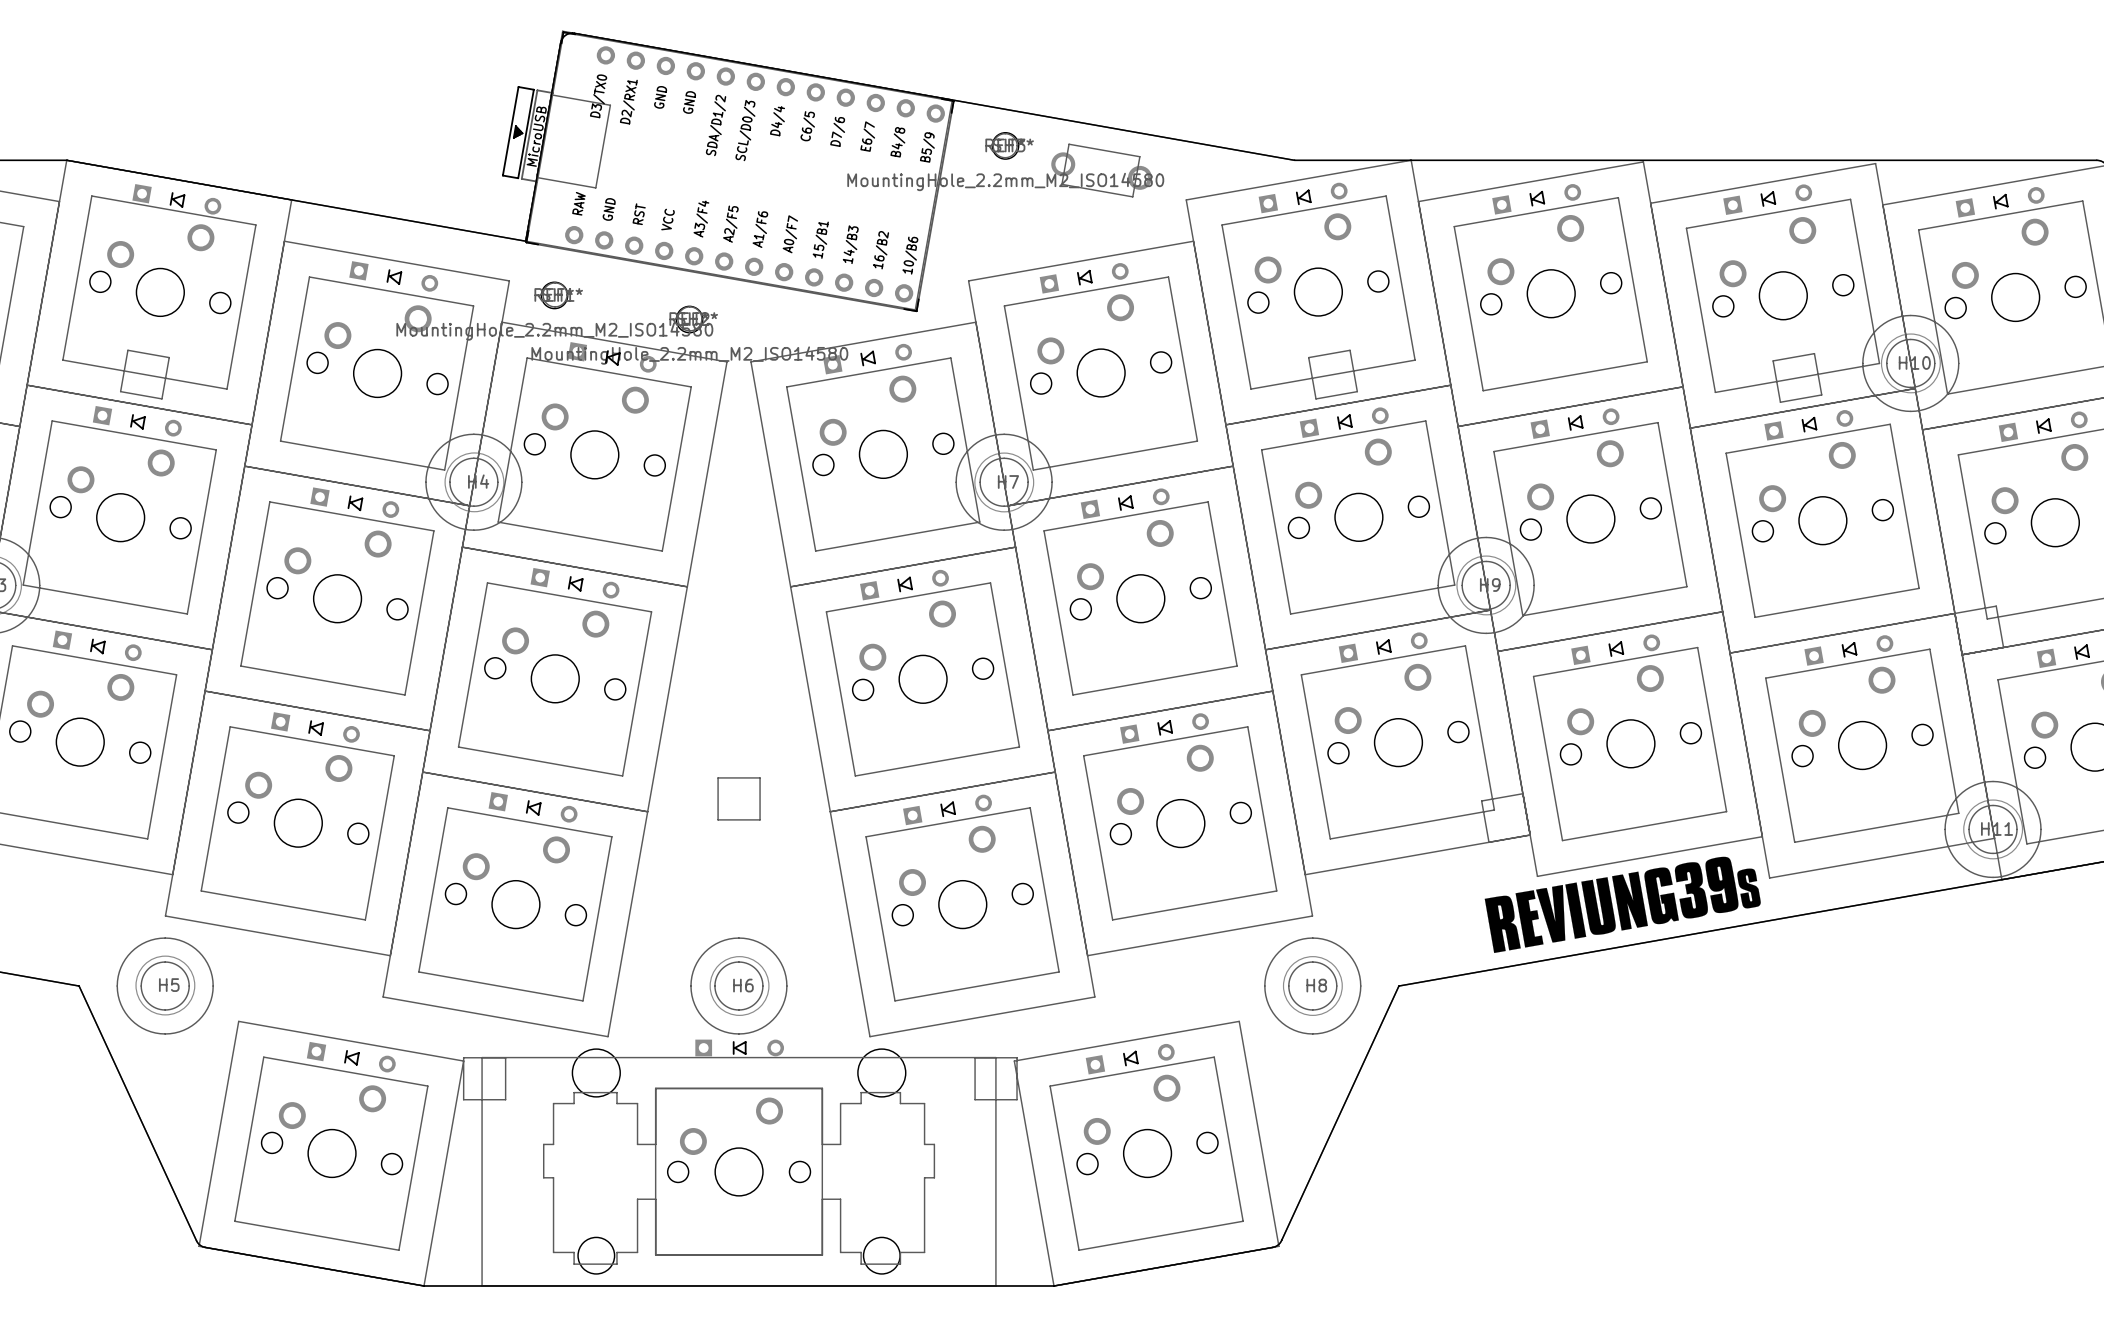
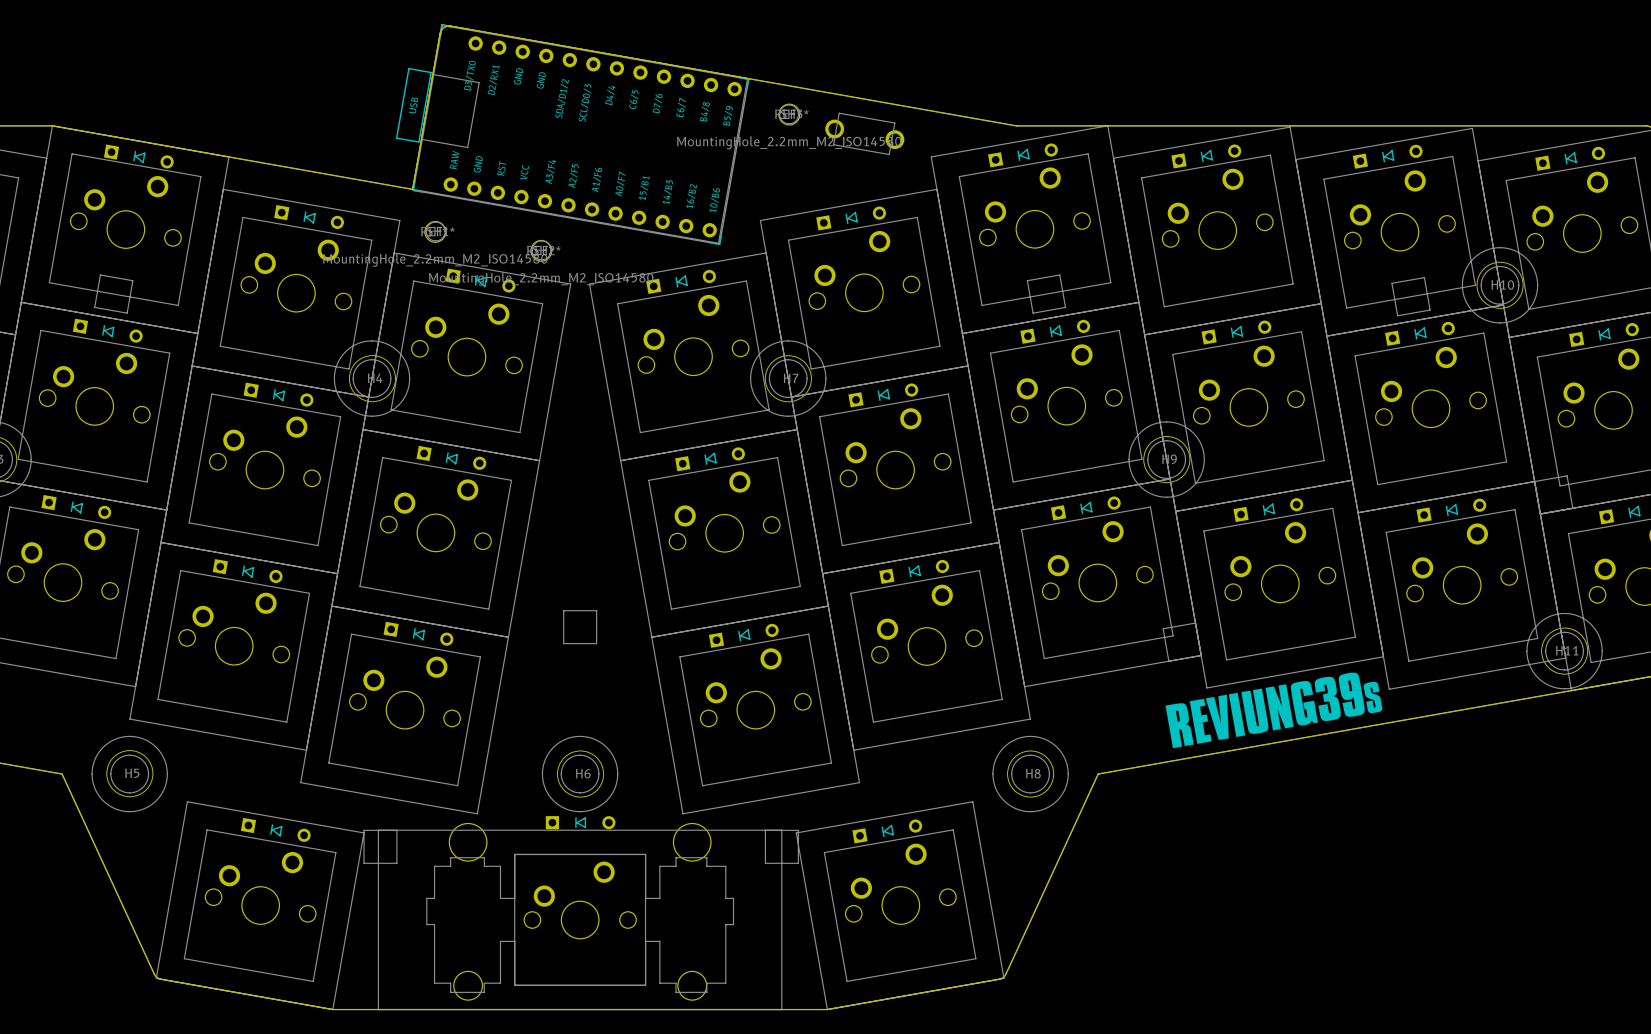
part footprint: [501, 31, 955, 313] -> [395, 24, 750, 246]

